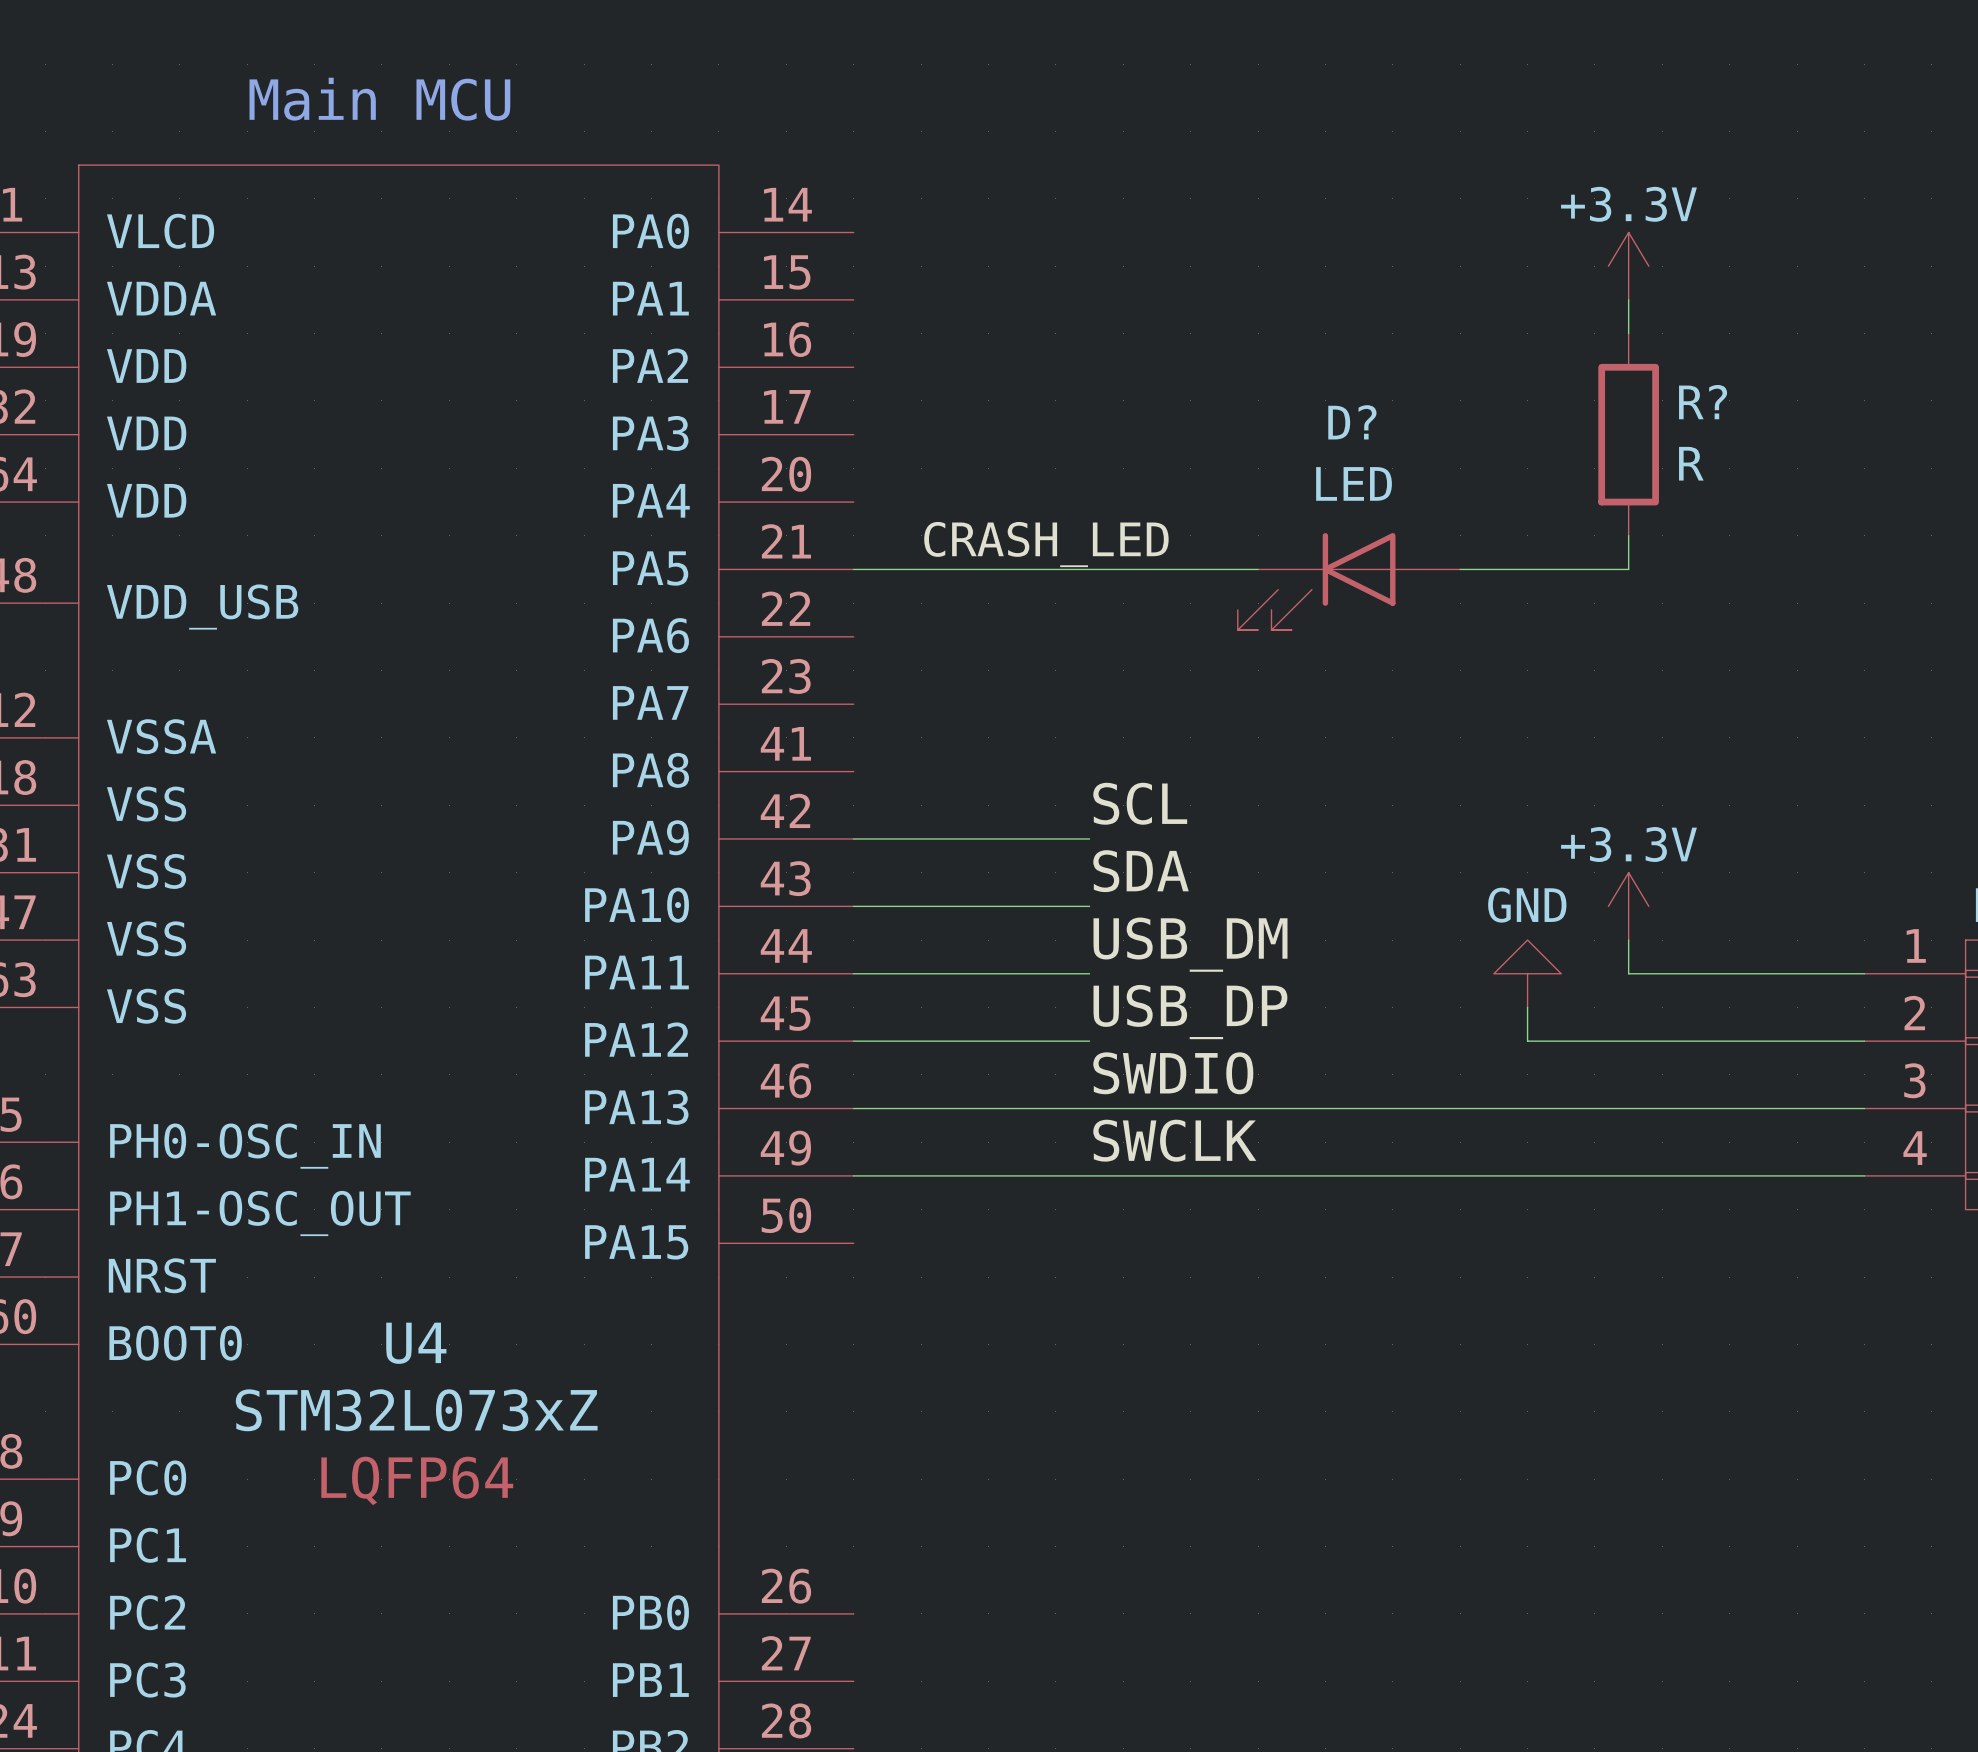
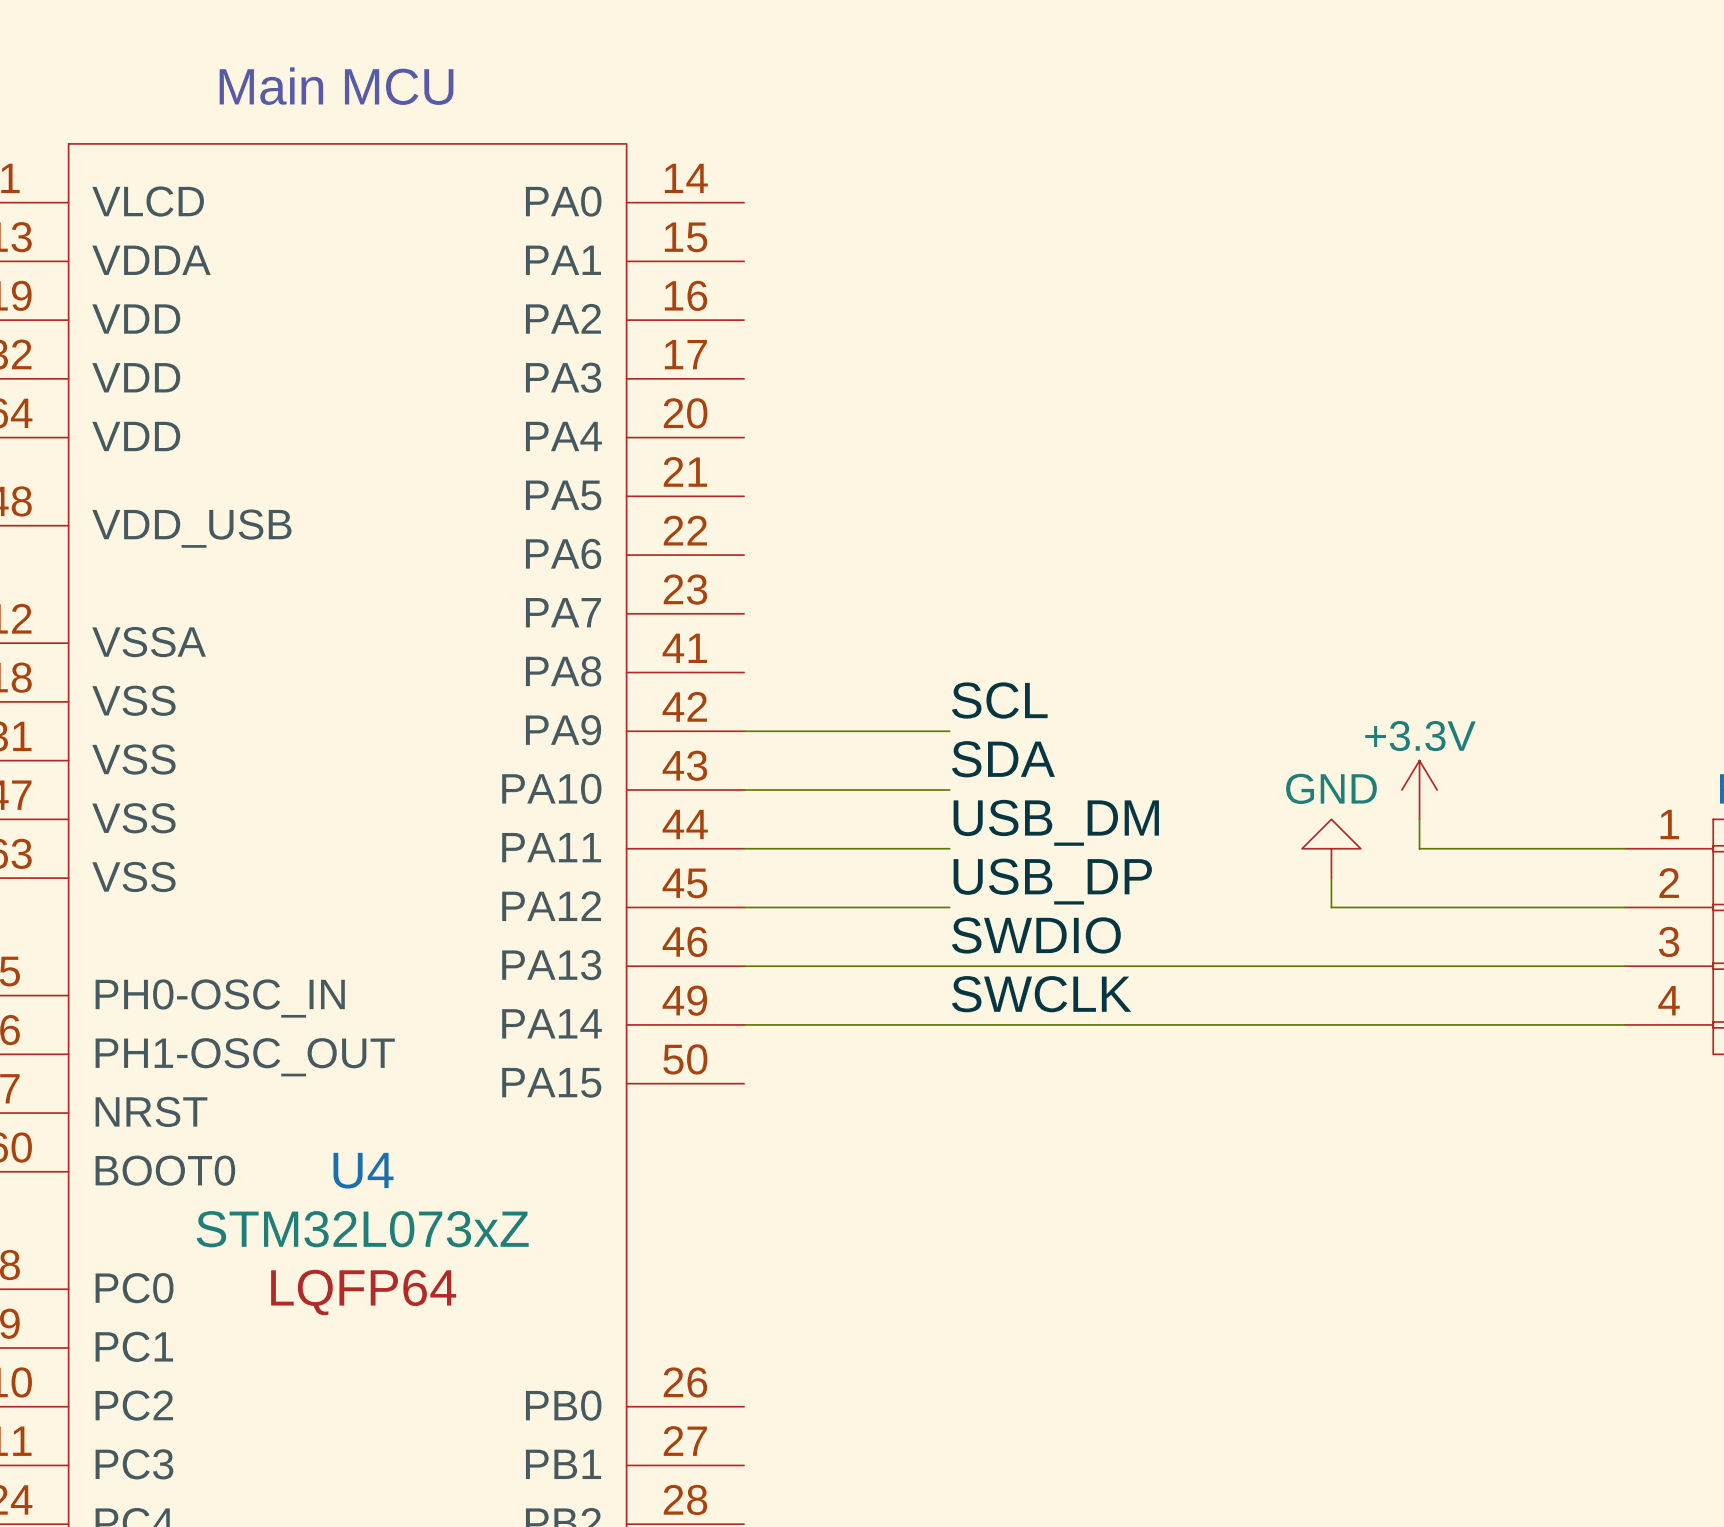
power symbol: +3.3V (1628, 266) -> none
wire: (1628, 299) (1628, 333) -> none
R?: R (1628, 434) -> none
wire: (1628, 535) (1628, 569) (1460, 569) -> none
label: CRASH_LED (1046, 544) -> none
wire: (853, 569) (1258, 569) -> none
D?: LED (1348, 581) -> none

